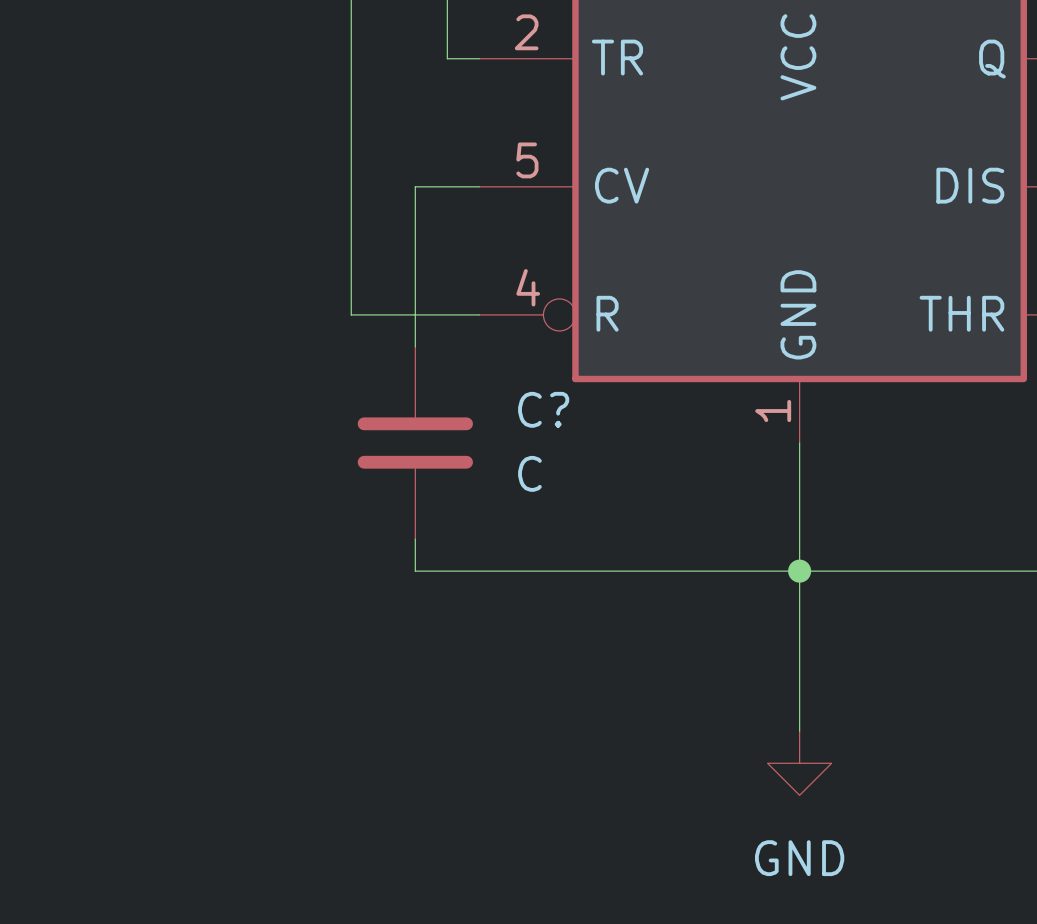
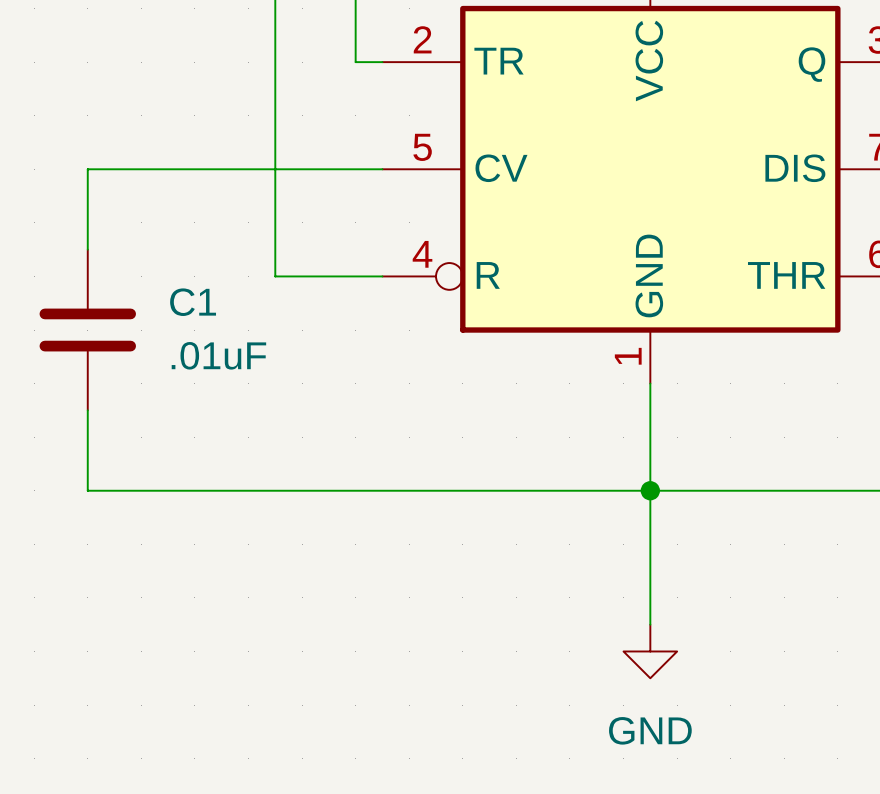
wire: (415, 186) (415, 346) -> (328, 169) (87, 169) (87, 249)
C1: none -> .01uF (87, 330)
C?: C (415, 443) -> none
wire: (415, 539) (415, 571) -> (87, 410) (87, 490) (328, 490)

